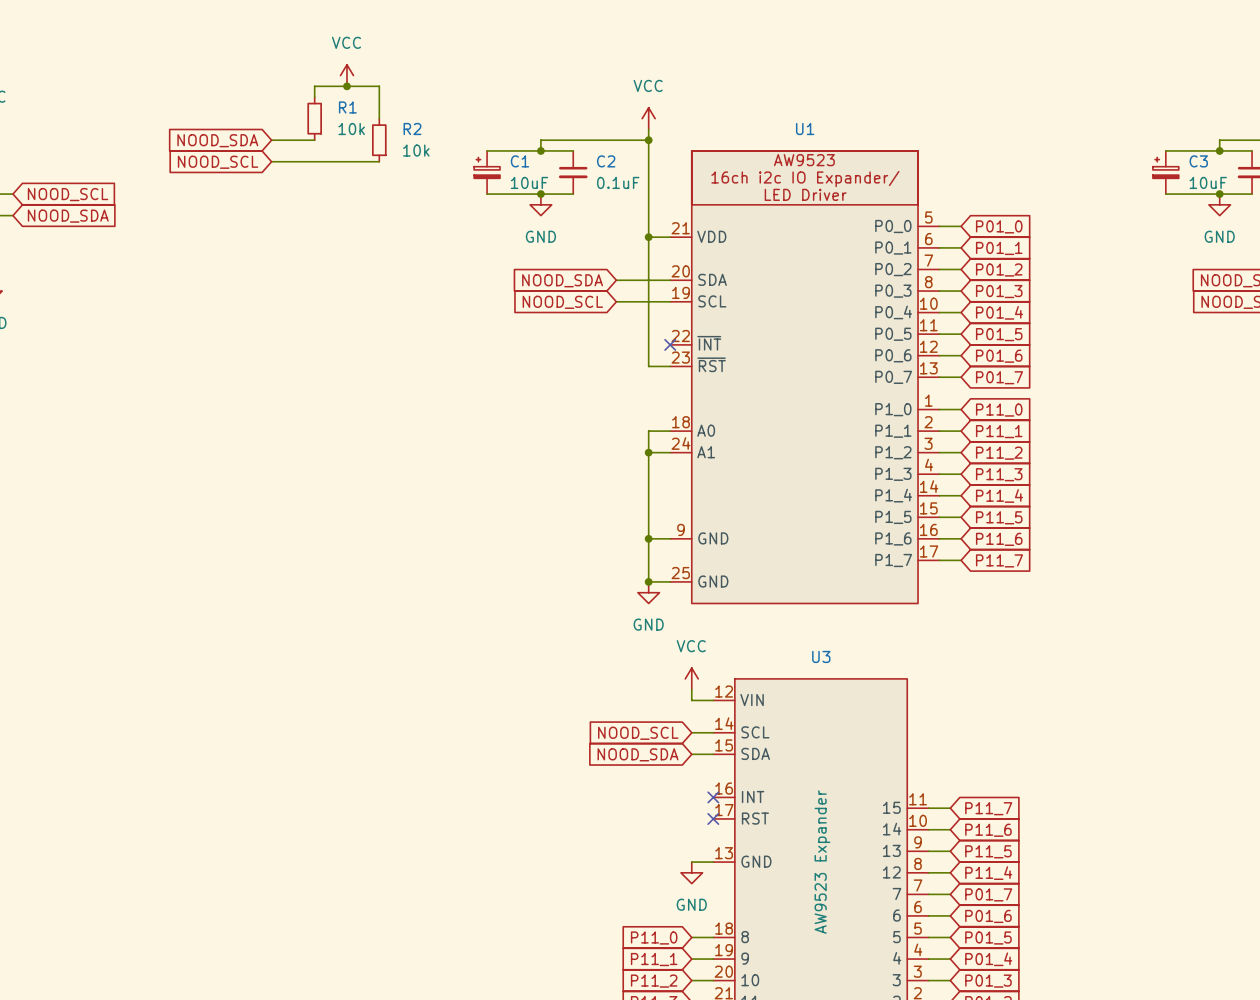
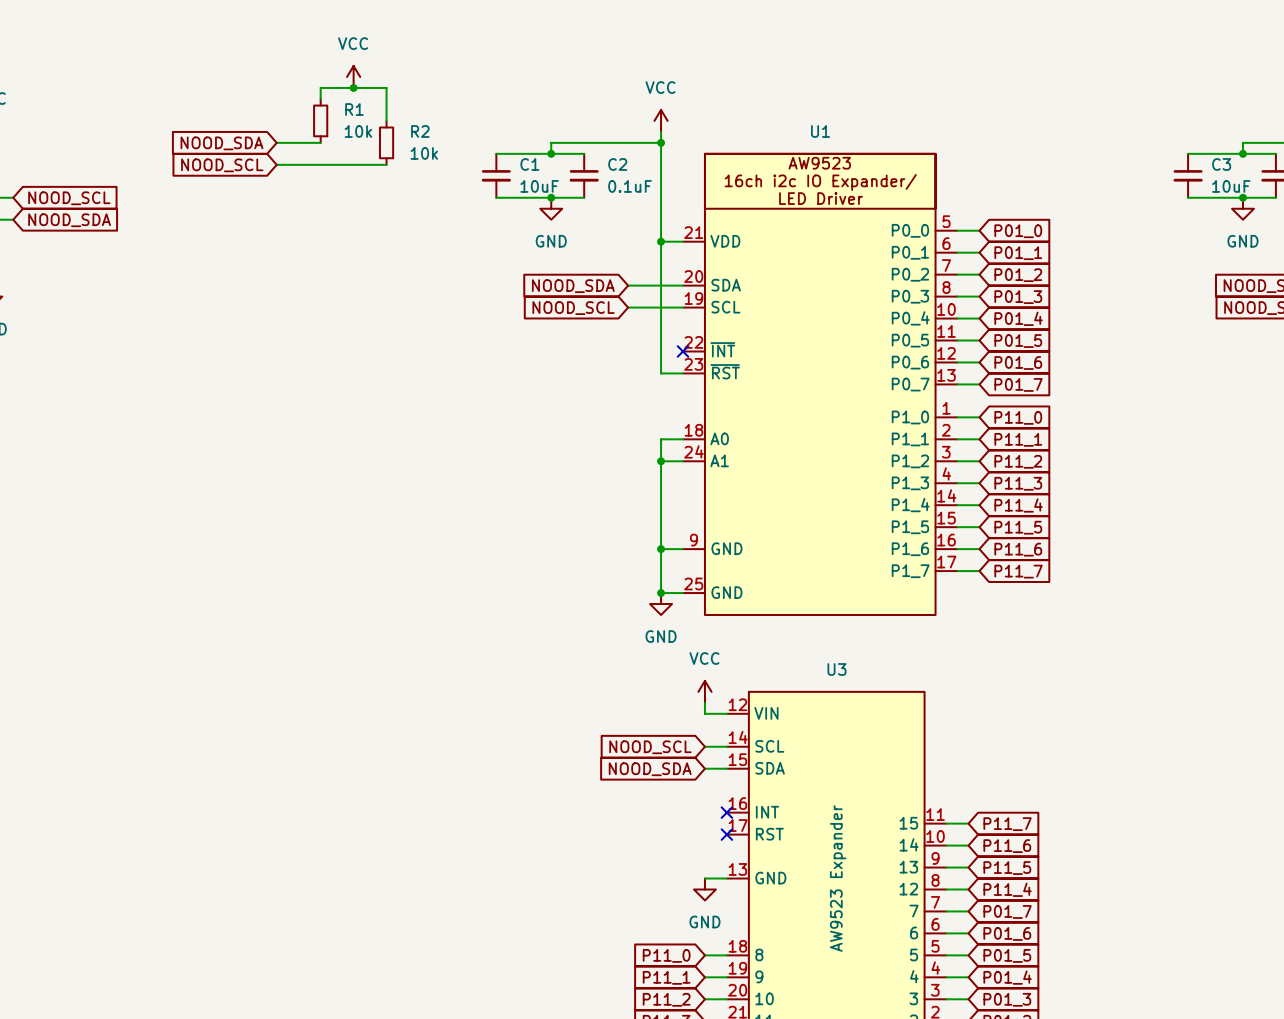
C1 symbol: [474, 150, 500, 195] -> [481, 153, 511, 198]
C3 symbol: [1152, 150, 1179, 195] -> [1173, 153, 1203, 198]

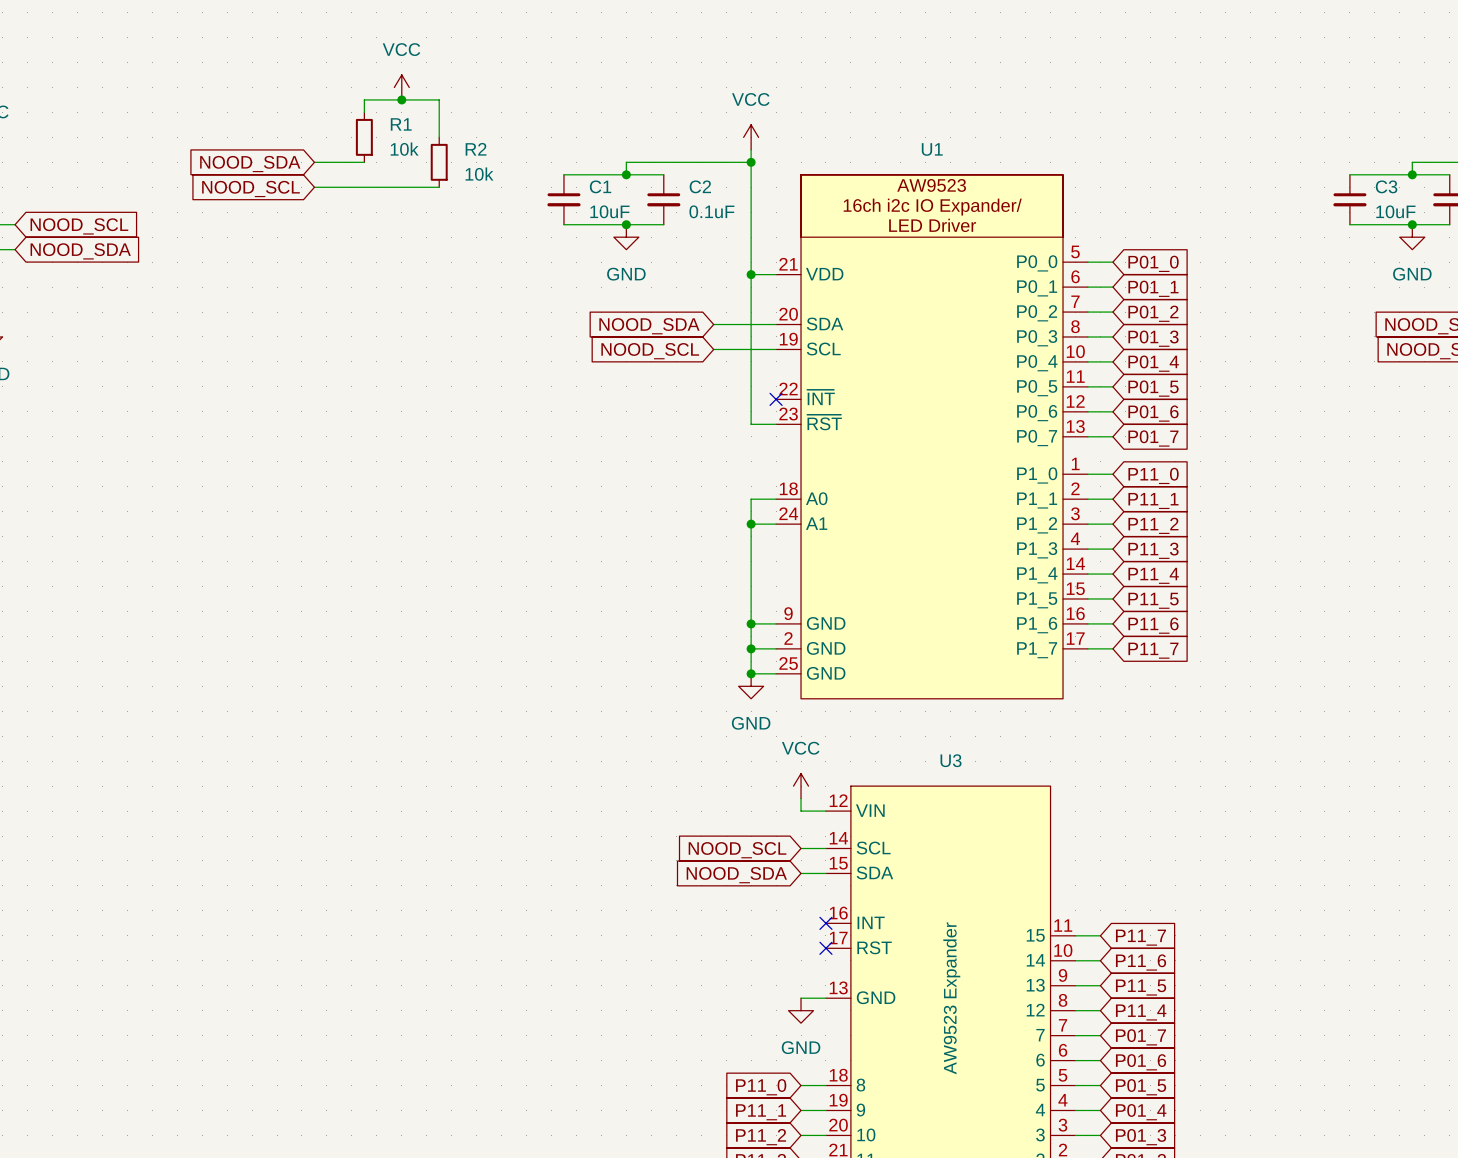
U1 symbol: [683, 153, 958, 616] -> [776, 174, 1088, 699]
wire: none -> (751, 648) (776, 648)
junction: none -> (751, 648)

